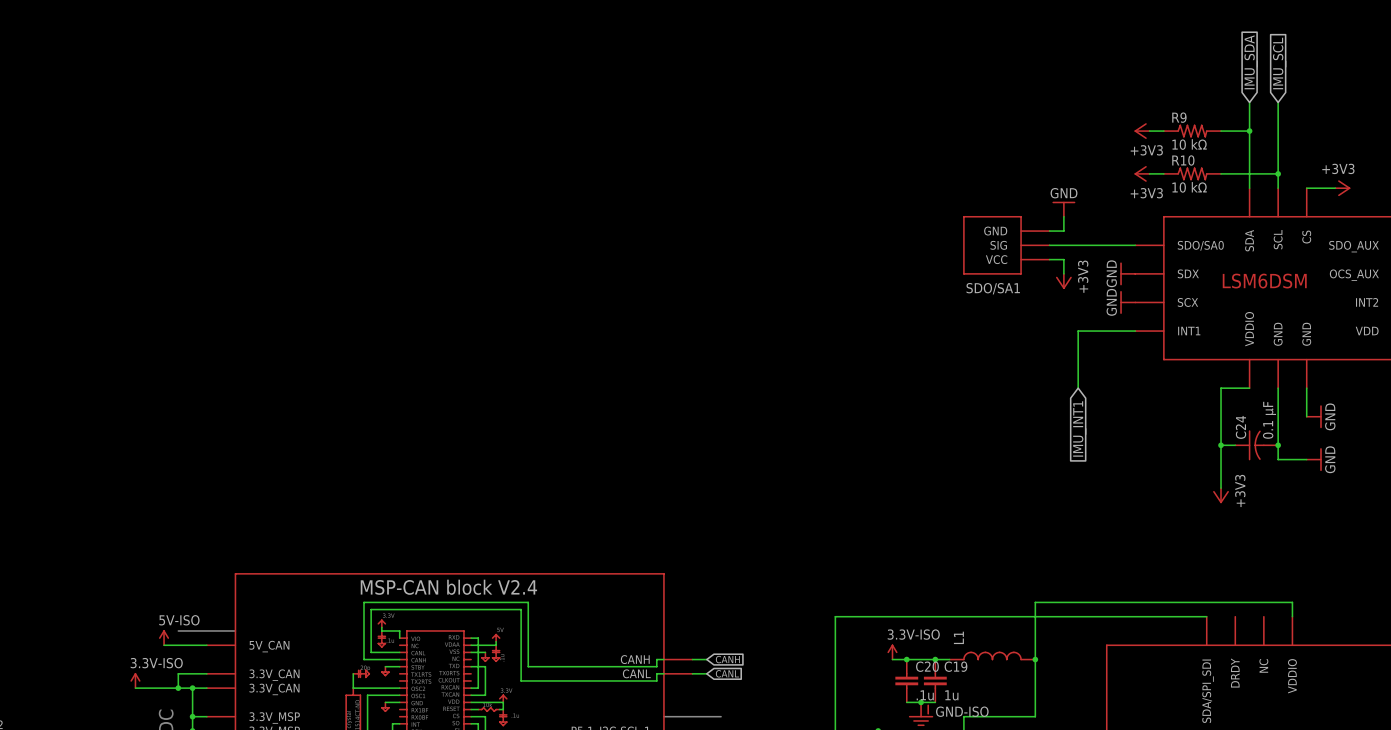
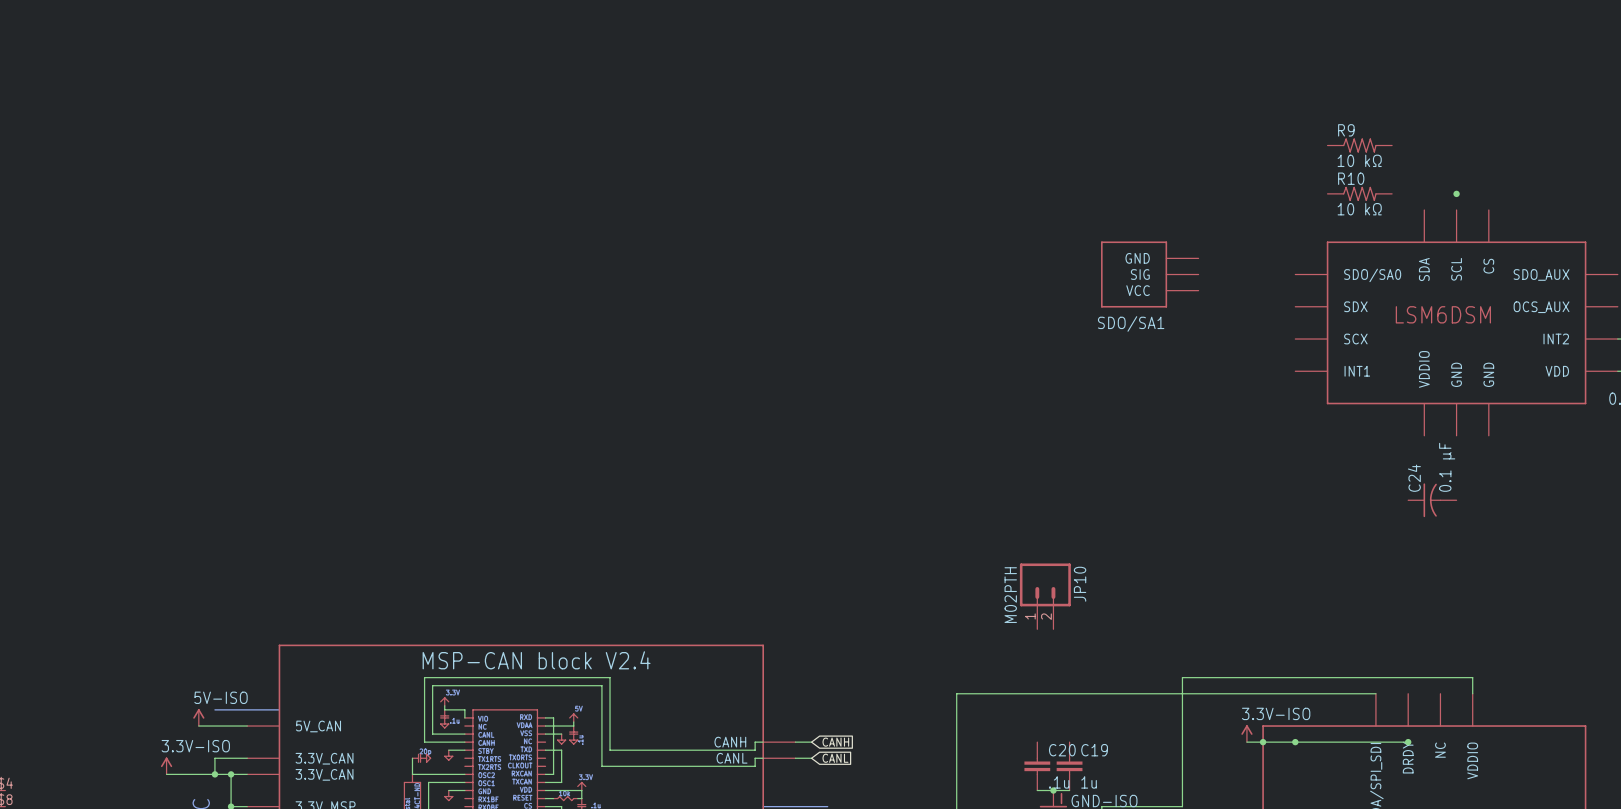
global label: IMU_SDA (1251, 62) -> none
global label: IMU_SCL (1279, 63) -> none
wire: (1249, 102) (1249, 188) -> none
wire: (1278, 102) (1278, 188) -> none
power symbol: +3V3 (1142, 131) -> none
wire: (1149, 131) (1163, 131) -> none
wire: (1221, 131) (1249, 131) -> none
junction: (1249, 131) -> none
power symbol: +3V3 (1142, 173) -> none
wire: (1149, 173) (1163, 173) -> none
wire: (1221, 173) (1278, 173) -> none
wire: (1306, 188) (1335, 188) -> none
power symbol: +3V3 (1342, 188) -> none
power symbol: GND (1063, 209) -> none
wire: (1063, 216) (1063, 231) (1049, 231) -> none
wire: (1049, 245) (1135, 245) -> none
wire: (1049, 259) (1063, 259) (1063, 273) -> none
power symbol: GND (1127, 273) -> none
power symbol: +3V3 (1063, 281) -> none
power symbol: GND (1127, 302) -> none
wire: (1135, 331) (1078, 331) (1078, 388) -> none
wire: (1249, 388) (1221, 388) (1221, 488) -> none
wire: (1278, 388) (1278, 459) (1306, 459) -> none
wire: (1306, 388) (1306, 416) -> none
power symbol: GND (1314, 416) -> none
global label: IMU_INT1 (1079, 429) -> none
wire: (1221, 445) (1235, 445) -> none
junction: (1221, 445) -> none
junction: (1278, 445) -> none
power symbol: GND (1314, 459) -> none
power symbol: +3V3 (1221, 495) -> none
JP10: none -> M02PTH (1045, 596)
power symbol: (892, 652) -> none
power symbol: none -> (1246, 733)
L1: (992, 655) -> none
wire: (892, 659) (949, 659) -> none
junction: (906, 659) -> none
junction: (935, 659) -> none
junction: (1035, 659) -> none
wire: none -> (1246, 742) (1408, 742)
junction: none -> (1263, 742)
junction: none -> (1295, 742)
junction: none -> (1408, 742)

